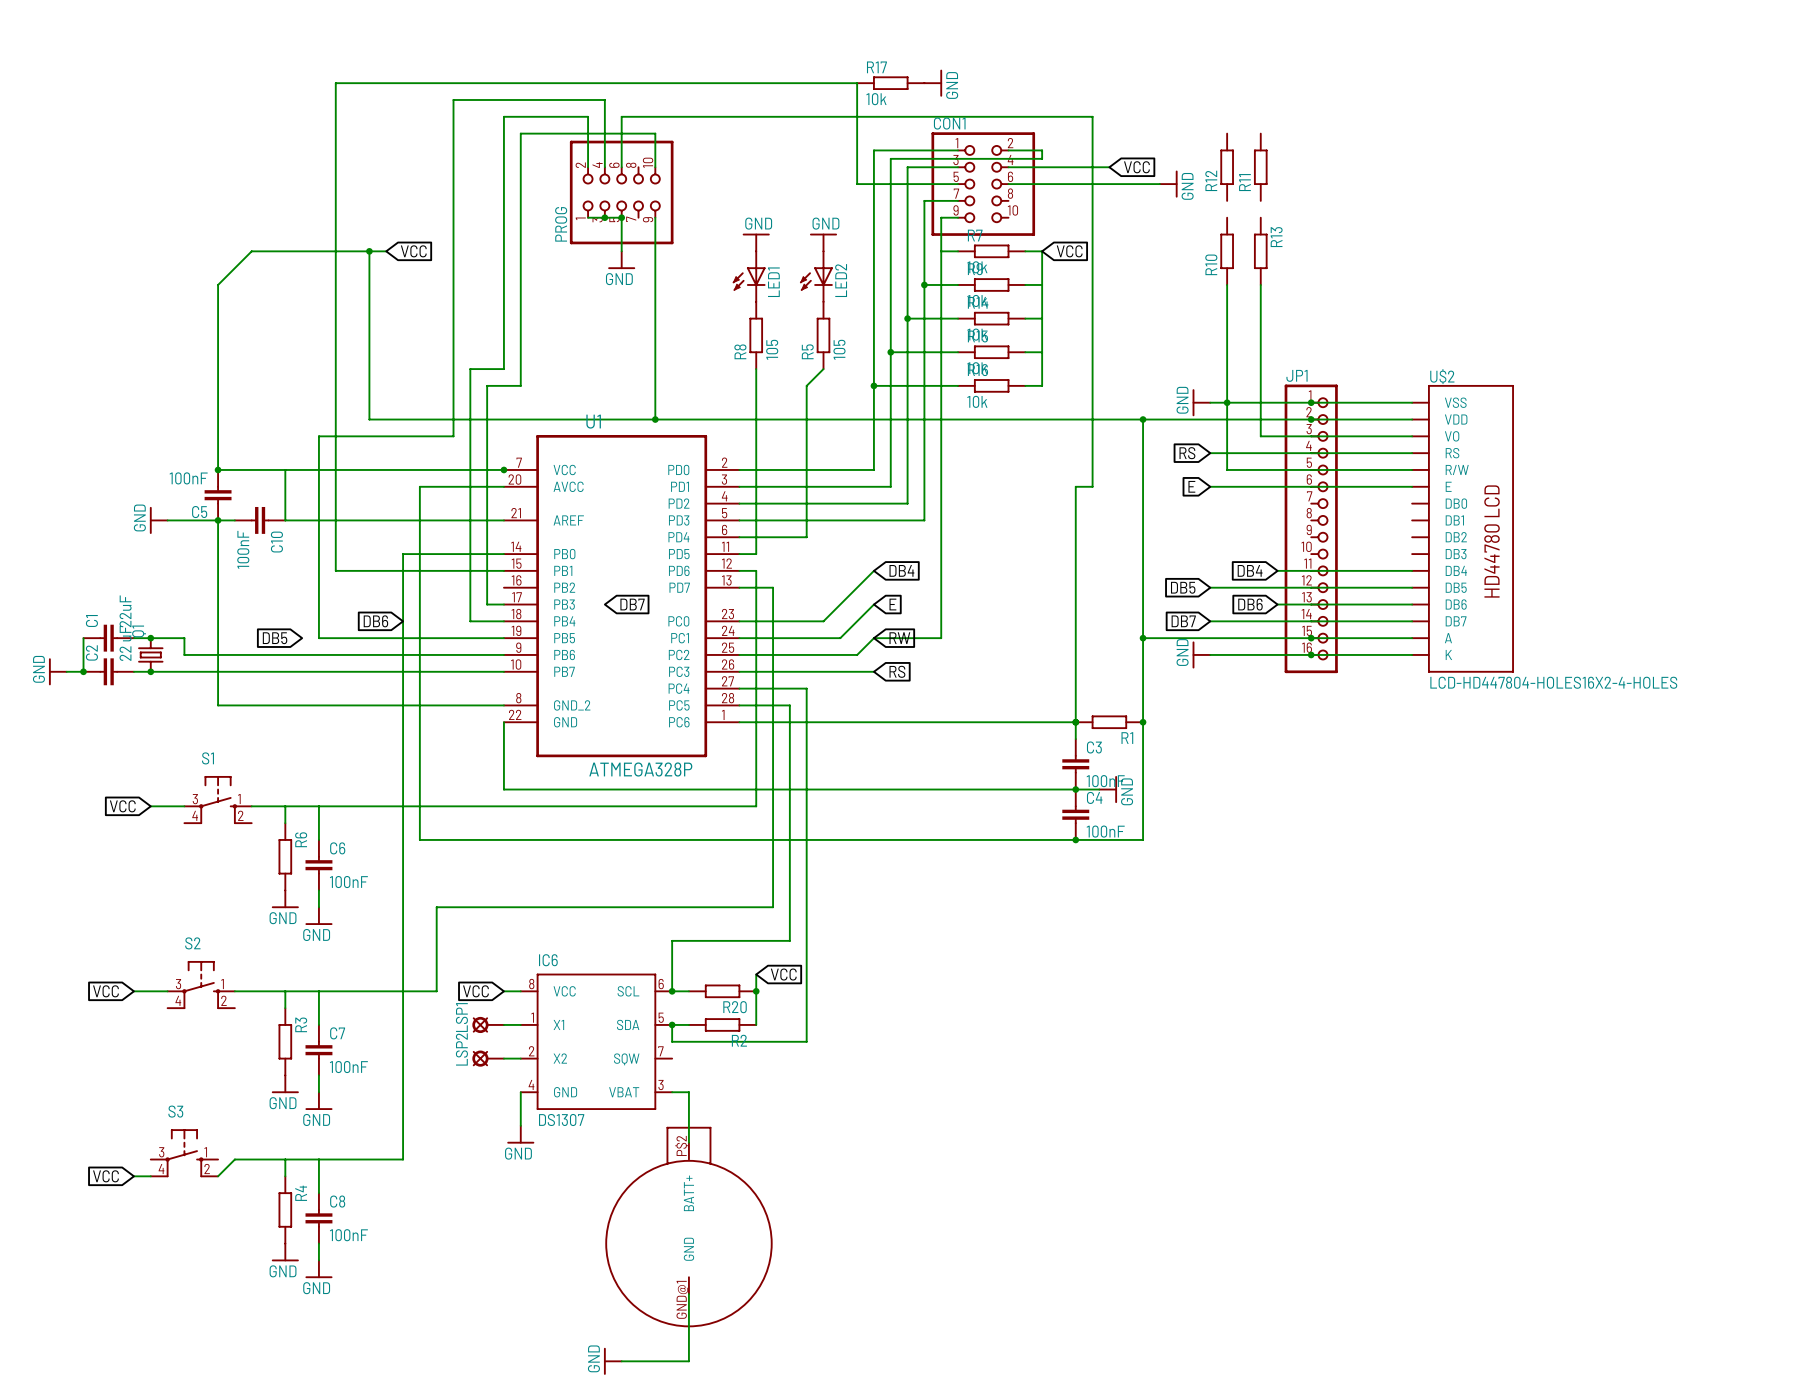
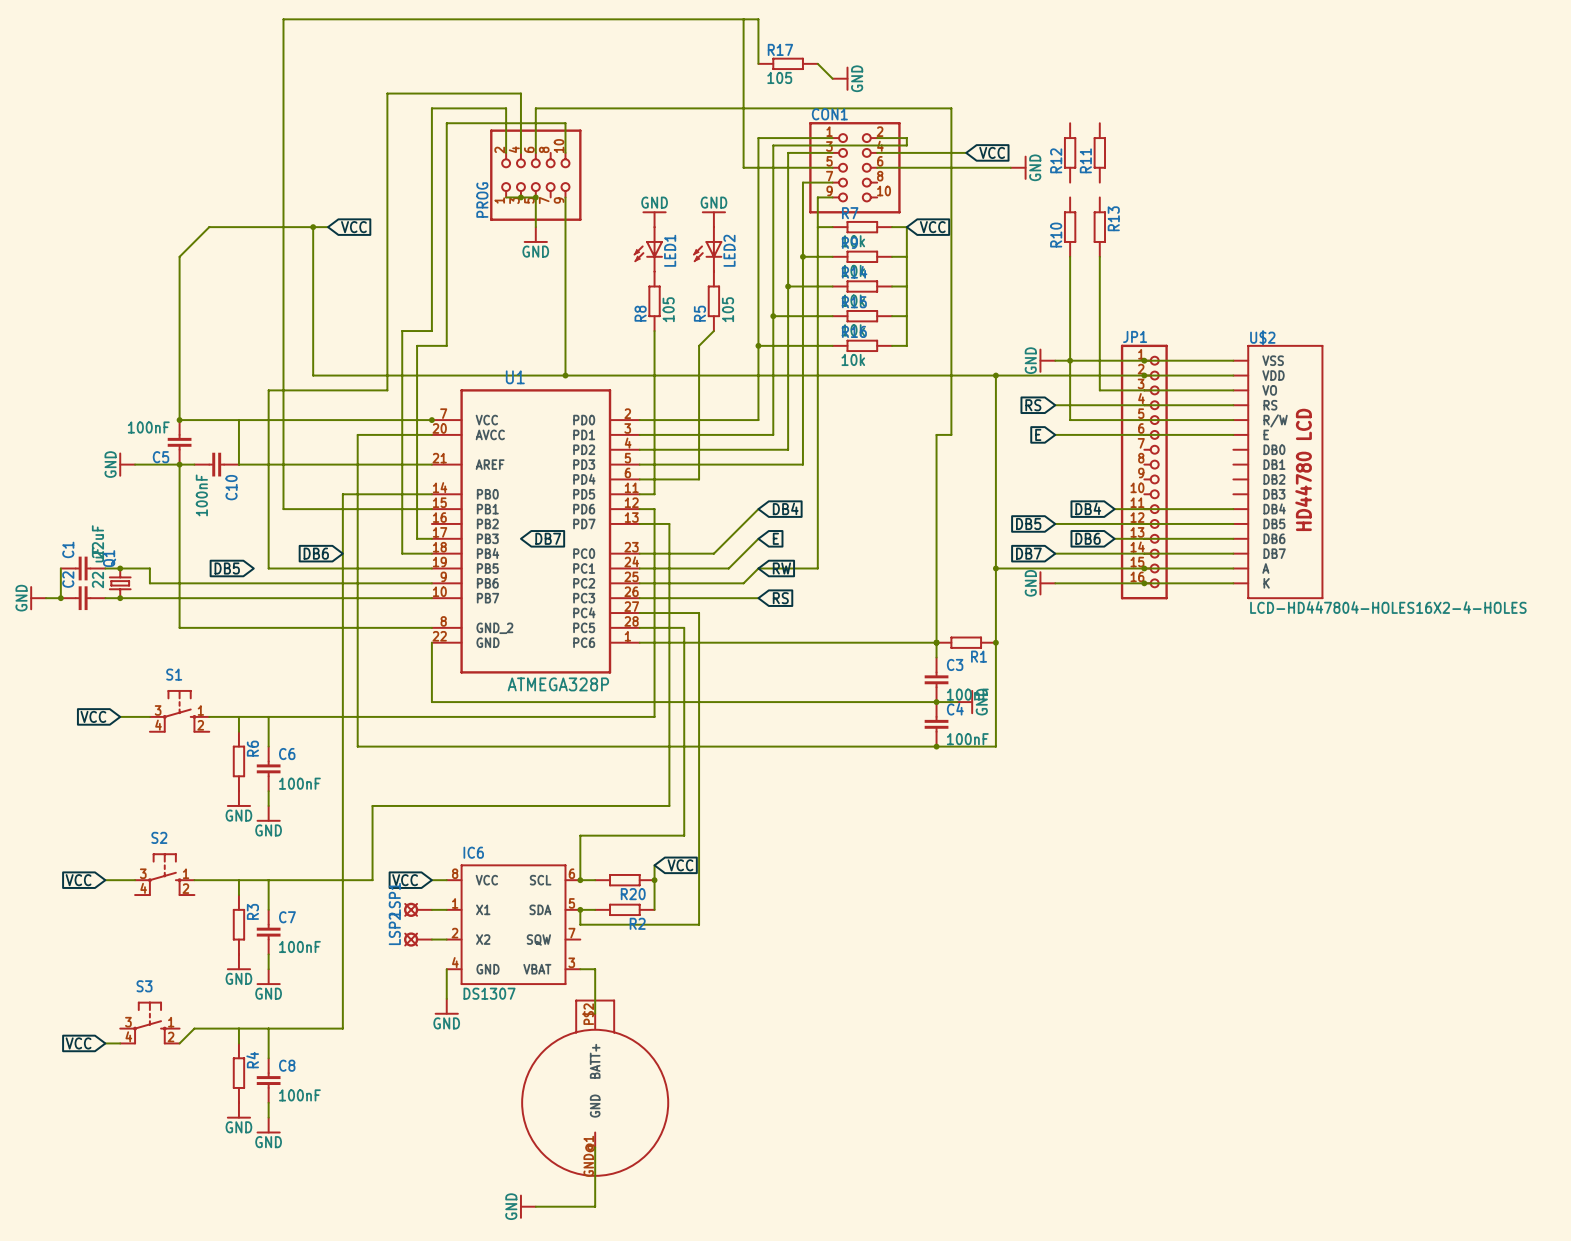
wire: none -> (743, 19) (743, 78)
wire: none -> (817, 63) (832, 78)
wire: (335, 83) (857, 83) -> (283, 78) (283, 19) (758, 19) (758, 63)
R17 position: (890, 83) -> (788, 63)
power symbol position: GND (933, 83) -> GND (840, 78)
R17 value: 10k (876, 99) -> 105 (779, 77)

